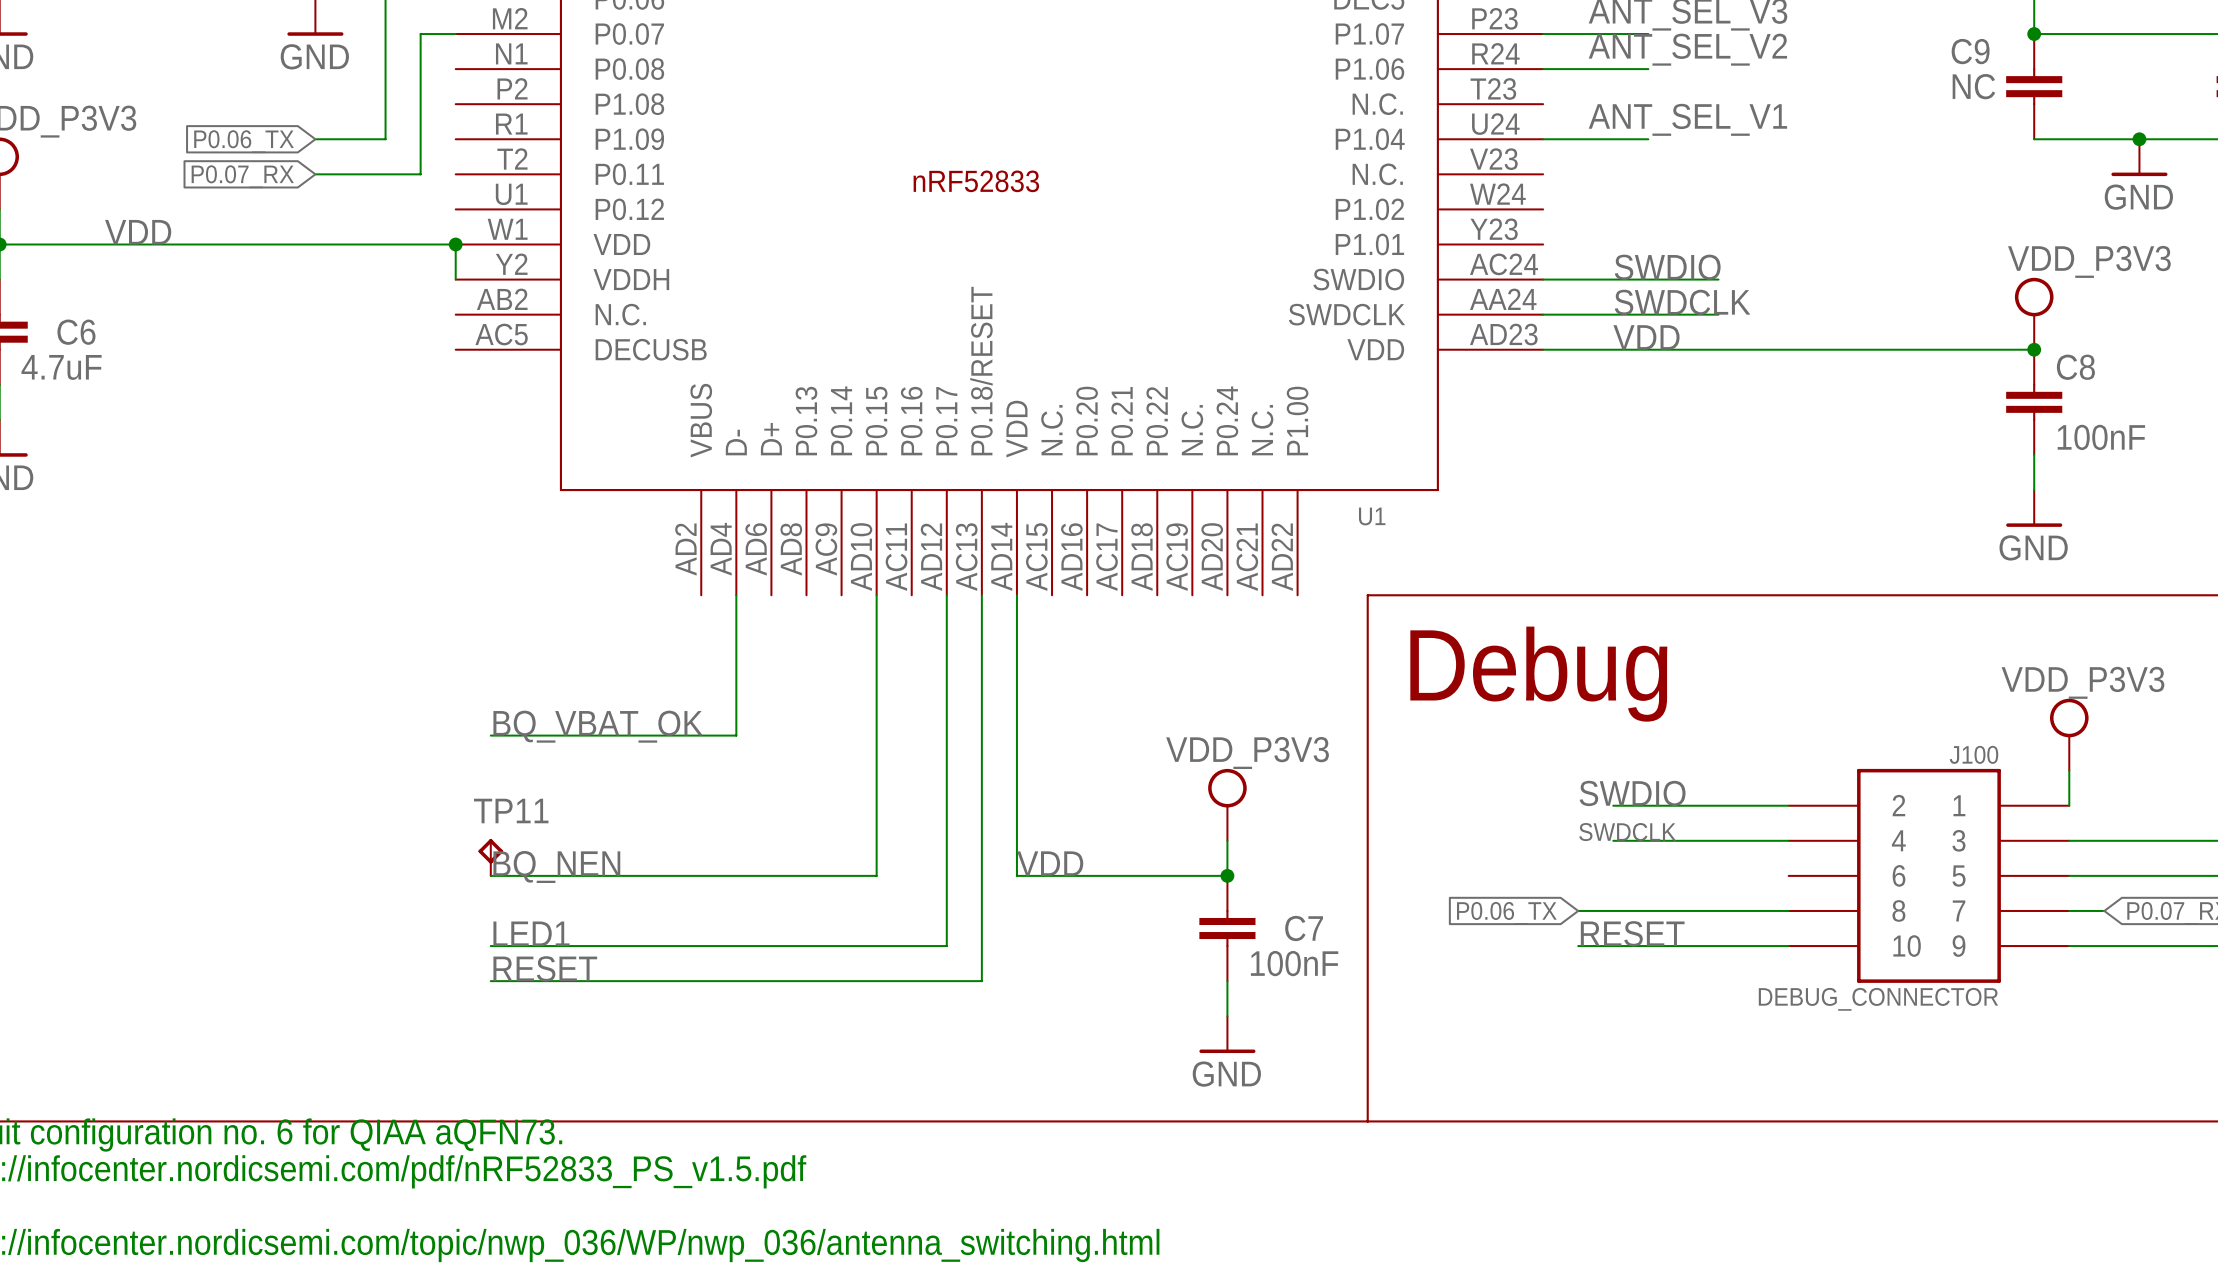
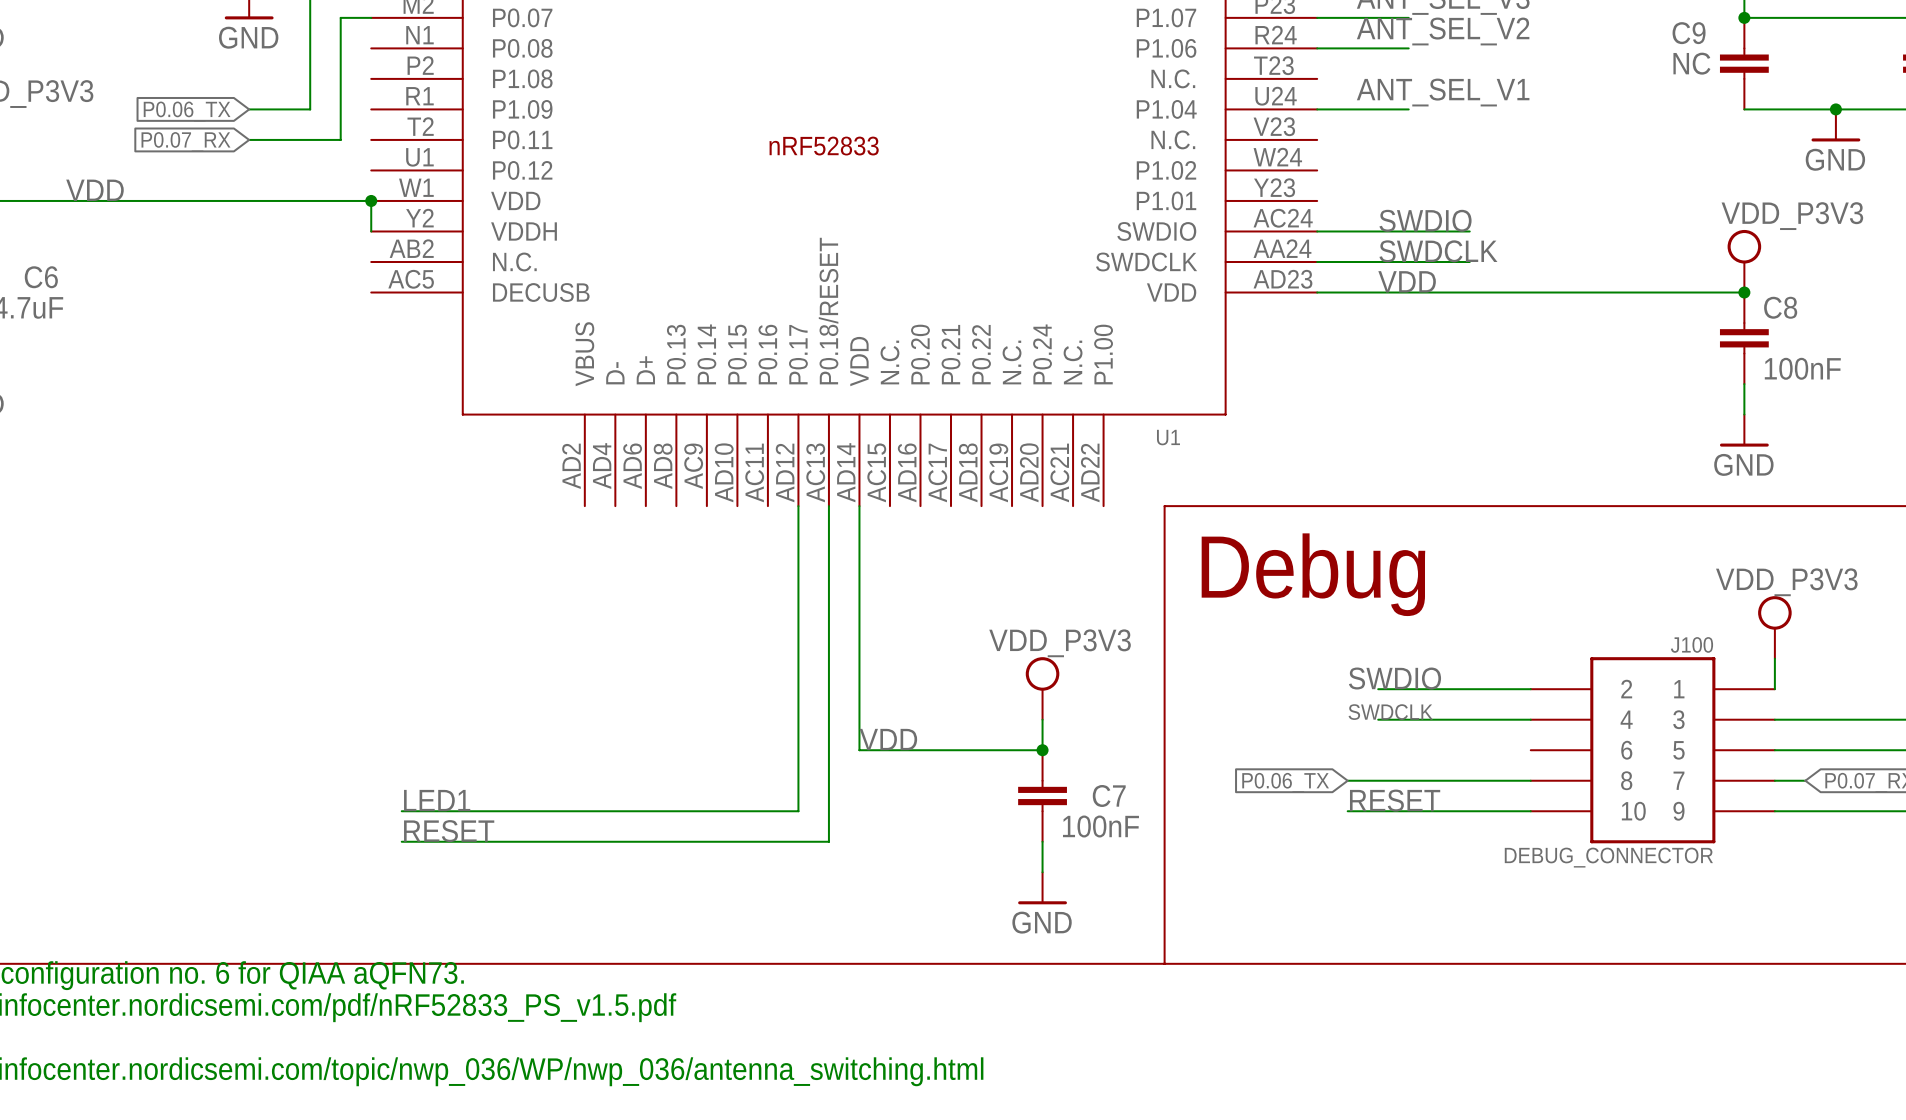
wire: (736, 595) (736, 735) (490, 735) -> none
wire: (876, 595) (876, 875) (490, 875) -> none
label: BQ_VBAT_OK (598, 726) -> none
TP11: (490, 857) -> none
label: BQ_NEN (556, 866) -> none

